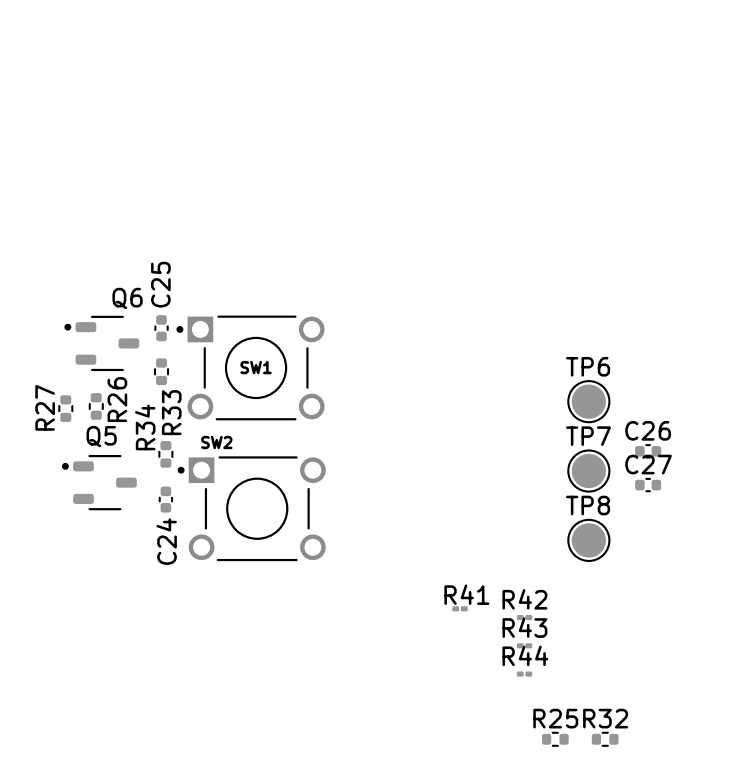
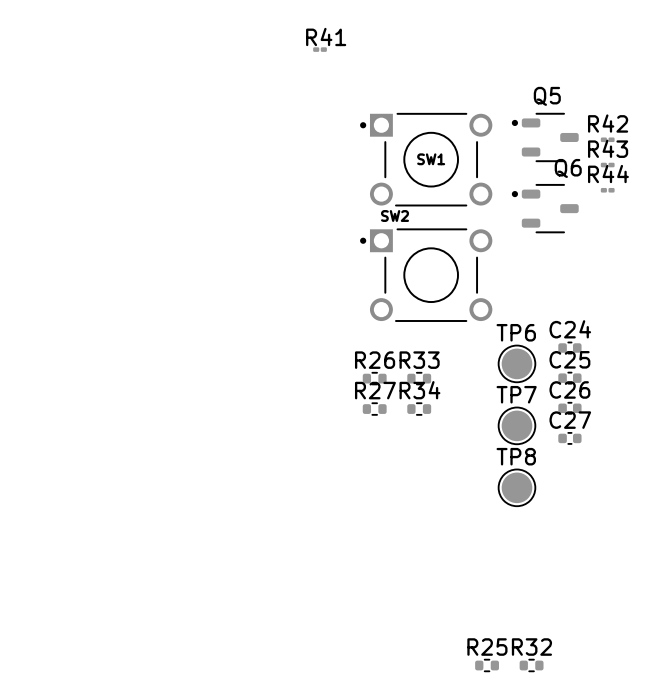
C25 rotation: 0° (161, 328) -> 90° clockwise (569, 378)
C25 position: (161, 328) -> (569, 378)
Q6 position: (101, 343) -> (545, 208)
SW1 position: (250, 367) -> (426, 159)
R33 rotation: 0° (161, 371) -> 90° clockwise (419, 378)
R33 position: (161, 371) -> (419, 378)
R26 rotation: 0° (96, 406) -> 90° clockwise (374, 378)
R26 position: (96, 406) -> (374, 378)
R27 rotation: 0° (65, 408) -> 90° clockwise (374, 409)
R27 position: (65, 408) -> (374, 409)
R33 name position: R33 (171, 412) -> R33 (419, 360)
R34 rotation: 0° (165, 454) -> 90° clockwise (419, 409)
R34 position: (165, 454) -> (419, 409)
Q5 position: (99, 482) -> (545, 137)
C24 rotation: 0° (165, 499) -> 90° clockwise (569, 348)
C24 position: (165, 499) -> (569, 348)
SW2 position: (251, 508) -> (426, 275)
C24 name position: C24 (166, 541) -> C24 (570, 329)
R41 position: (460, 608) -> (320, 49)
R42 position: (524, 617) -> (607, 139)
R43 position: (524, 645) -> (607, 165)
R44 position: (524, 674) -> (607, 190)

